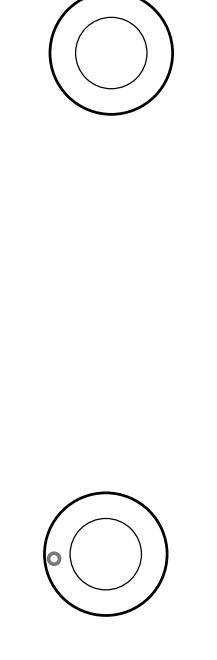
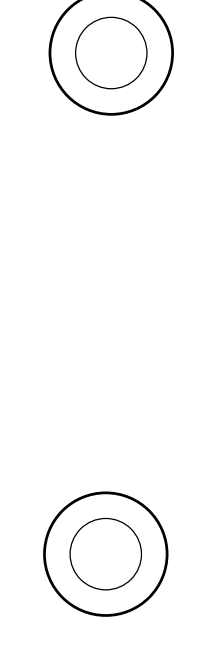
via: (54, 558) -> none

